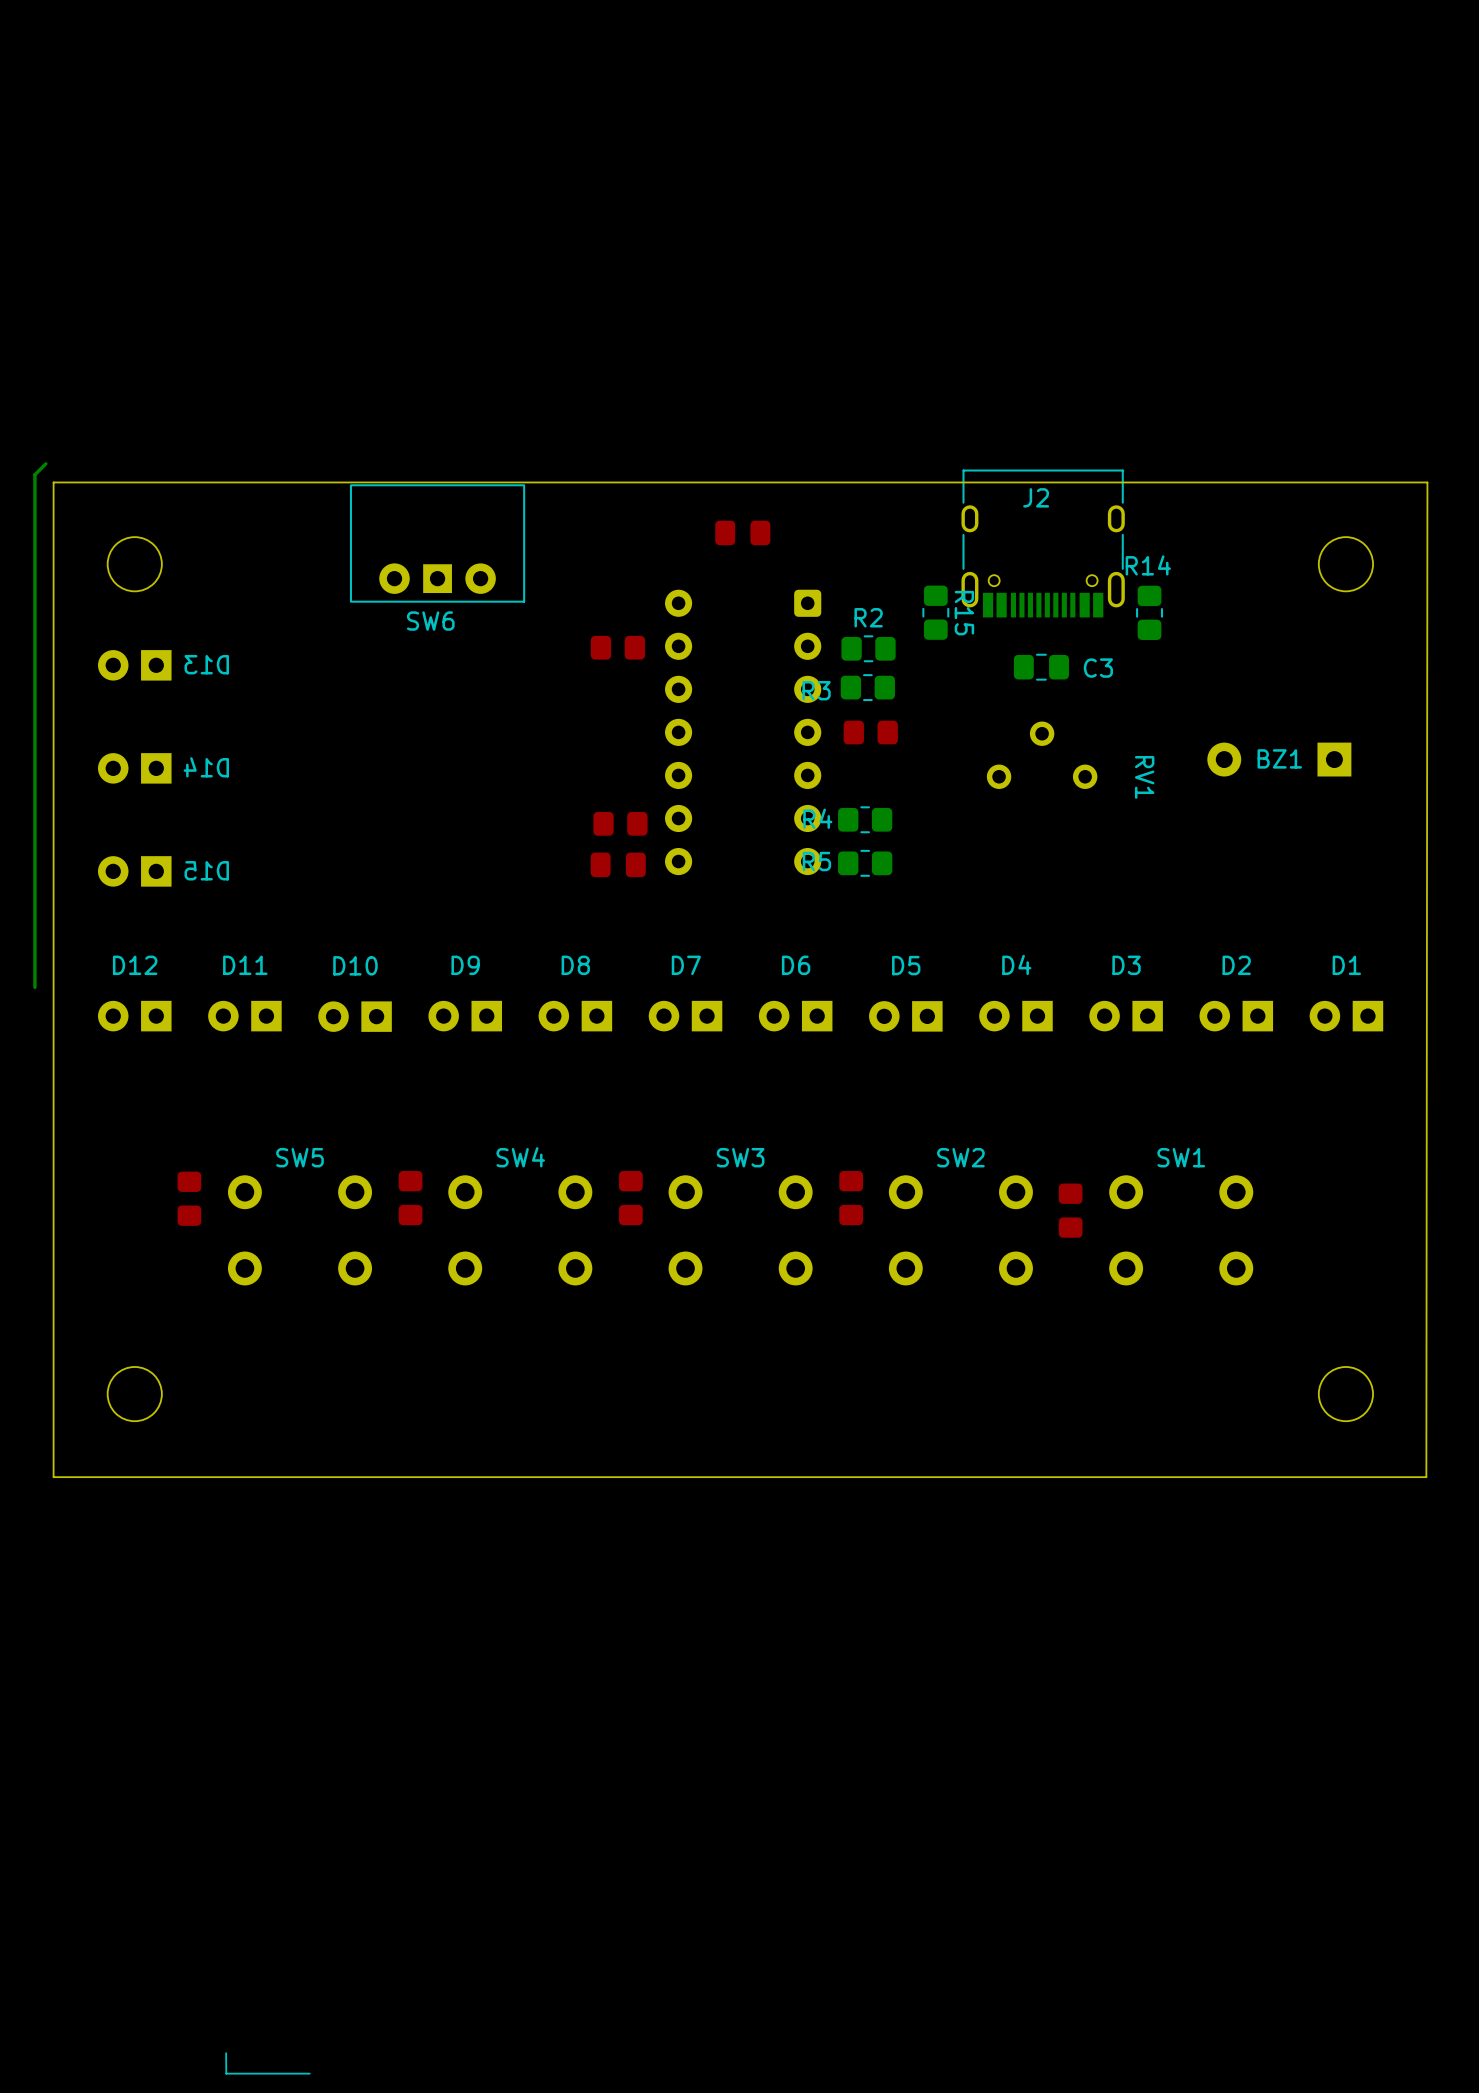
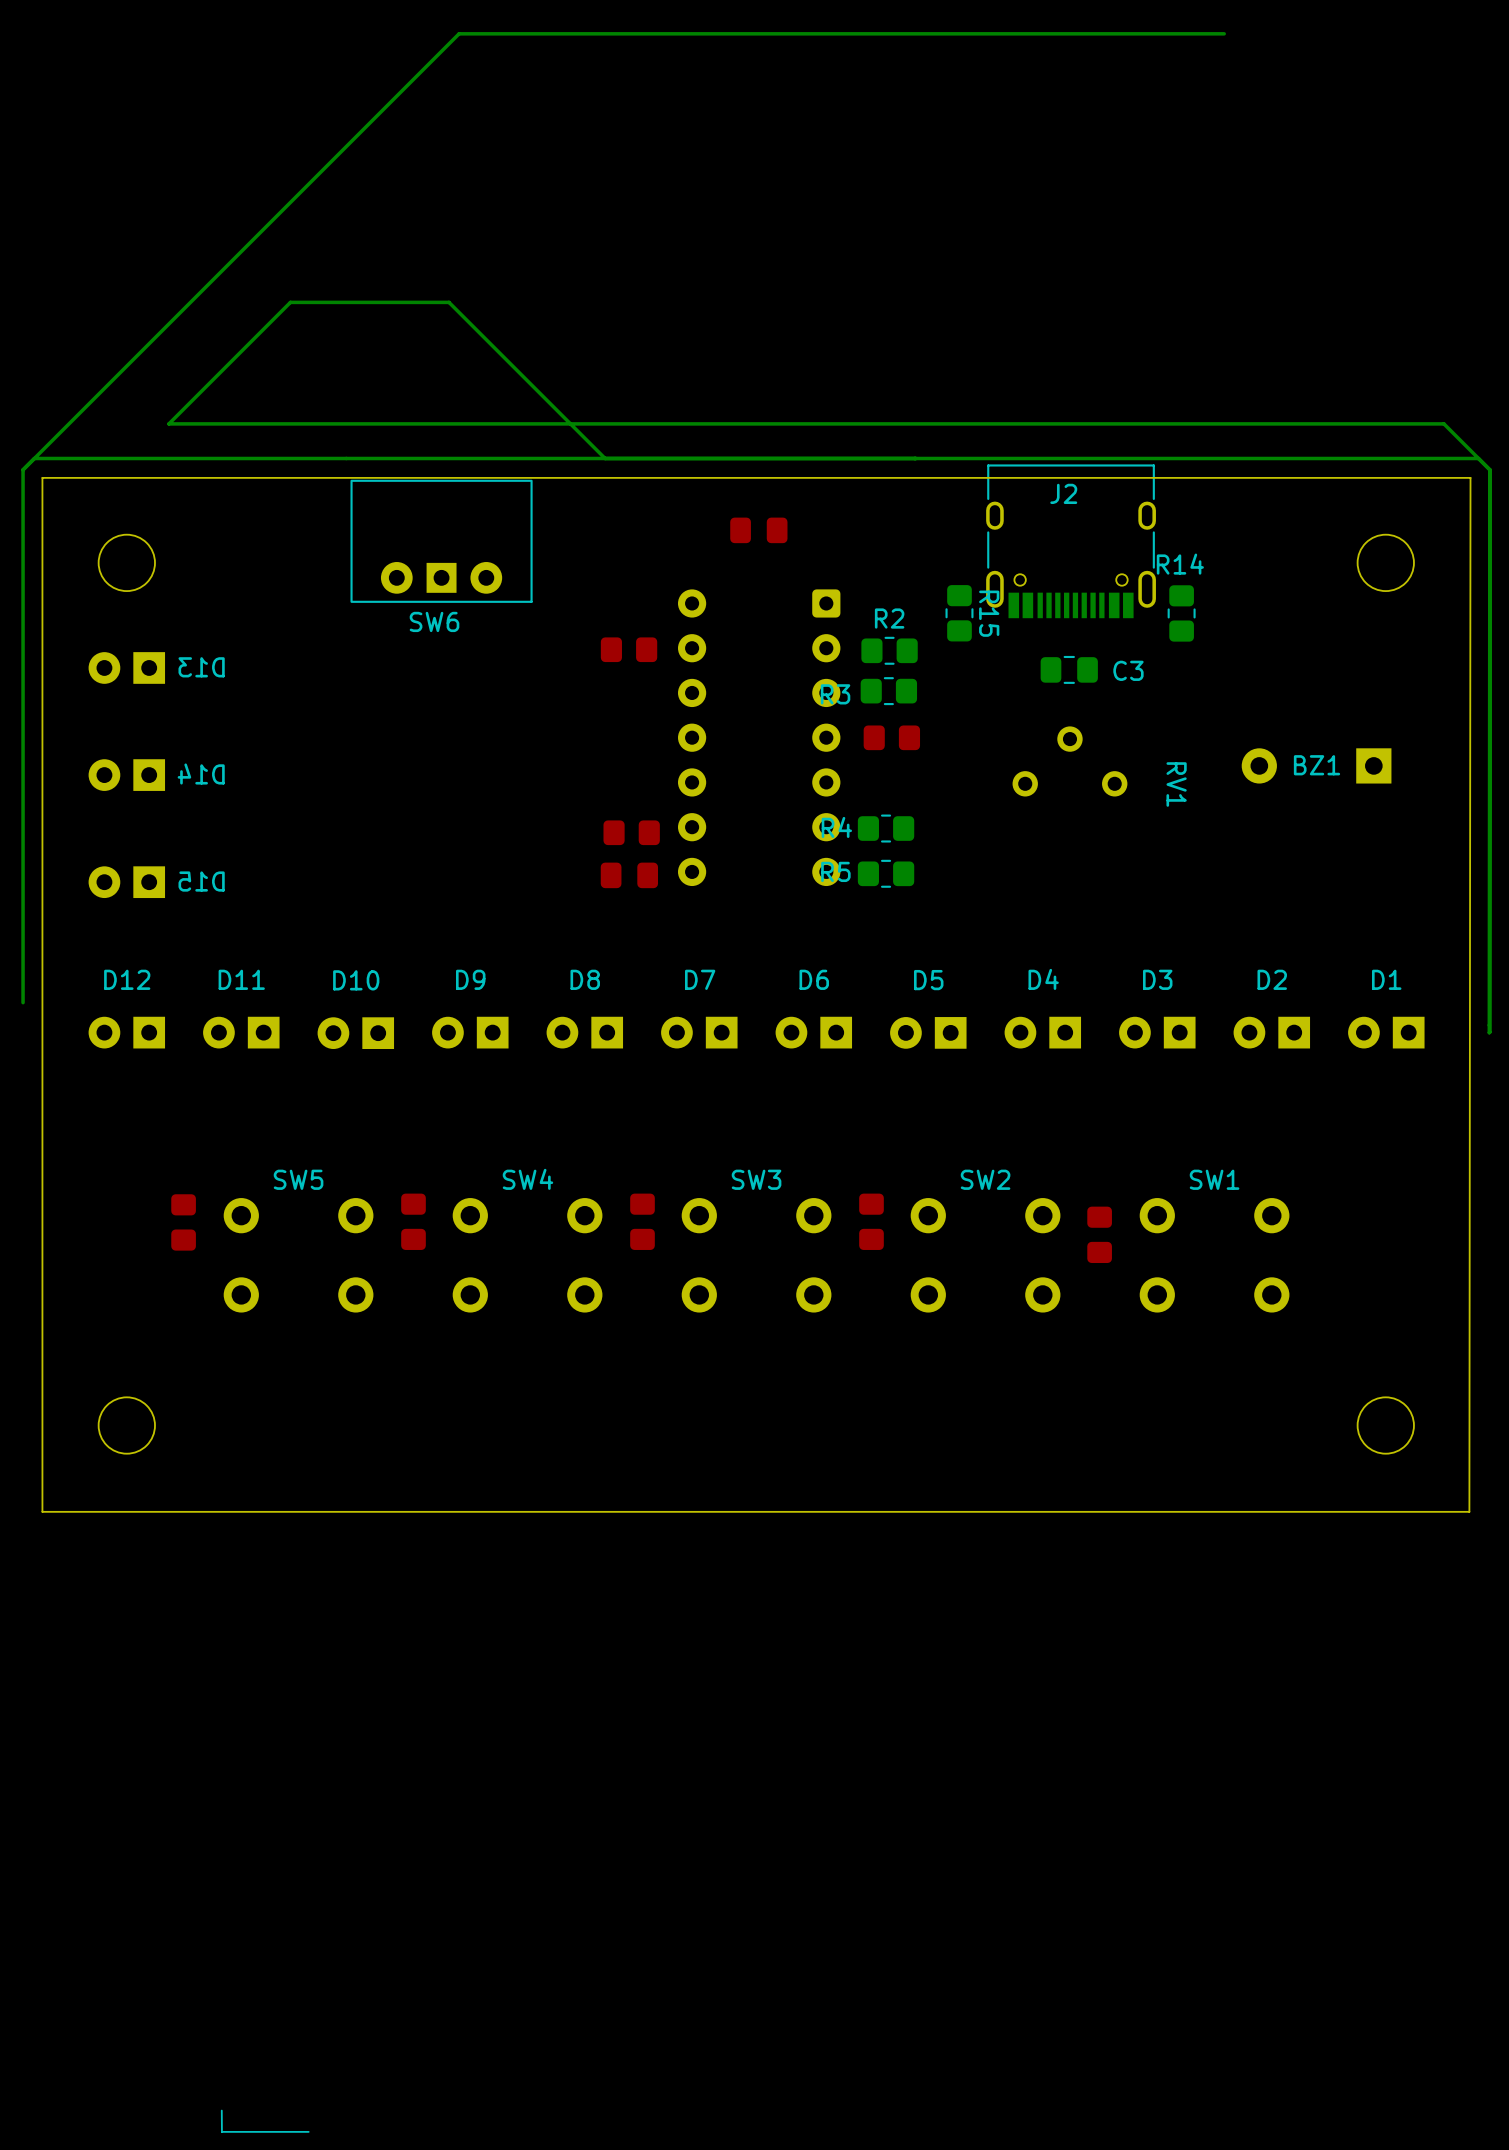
bottom track: none -> (1224, 33) (459, 33) (34, 458) (1478, 458)
bottom track: none -> (605, 458) (449, 302) (290, 302) (168, 423) (1443, 423) (1489, 469) (1489, 1032) (1489, 485)

